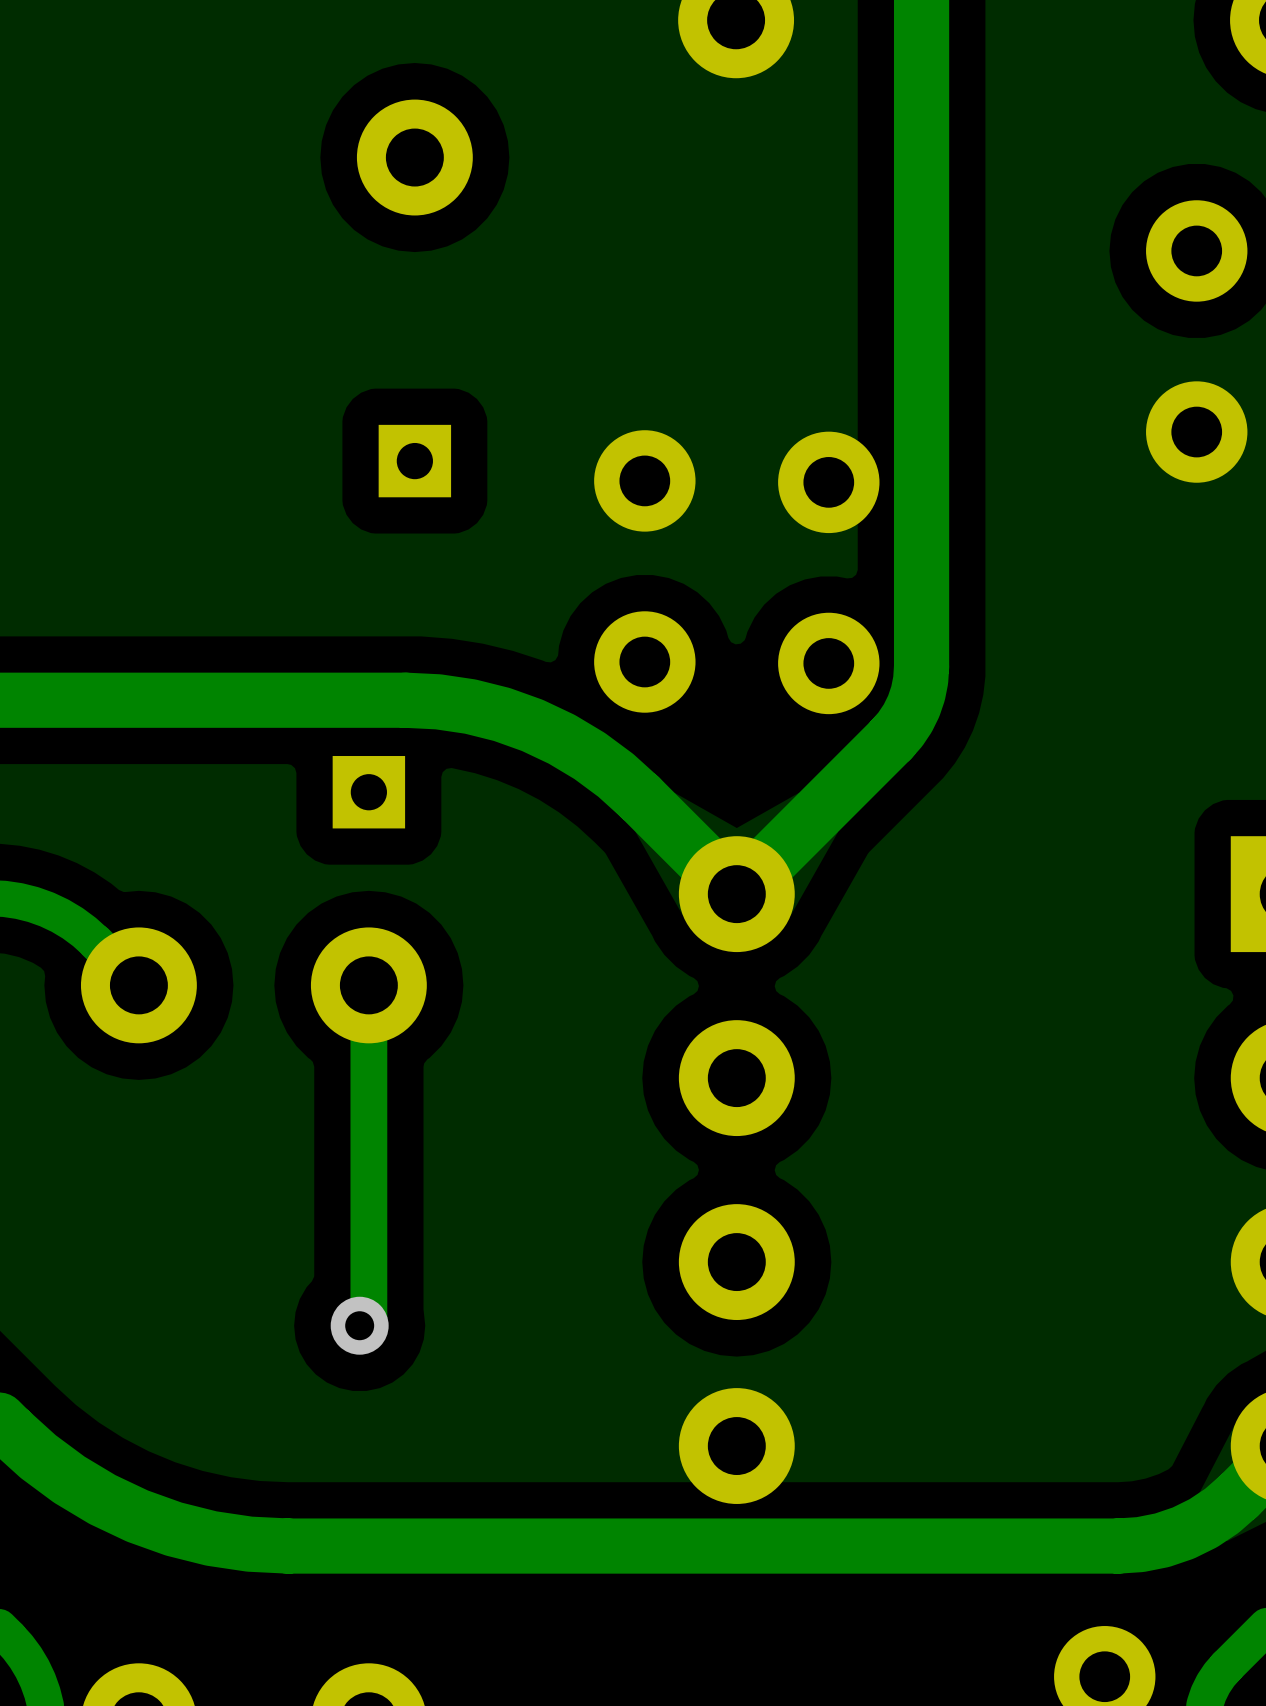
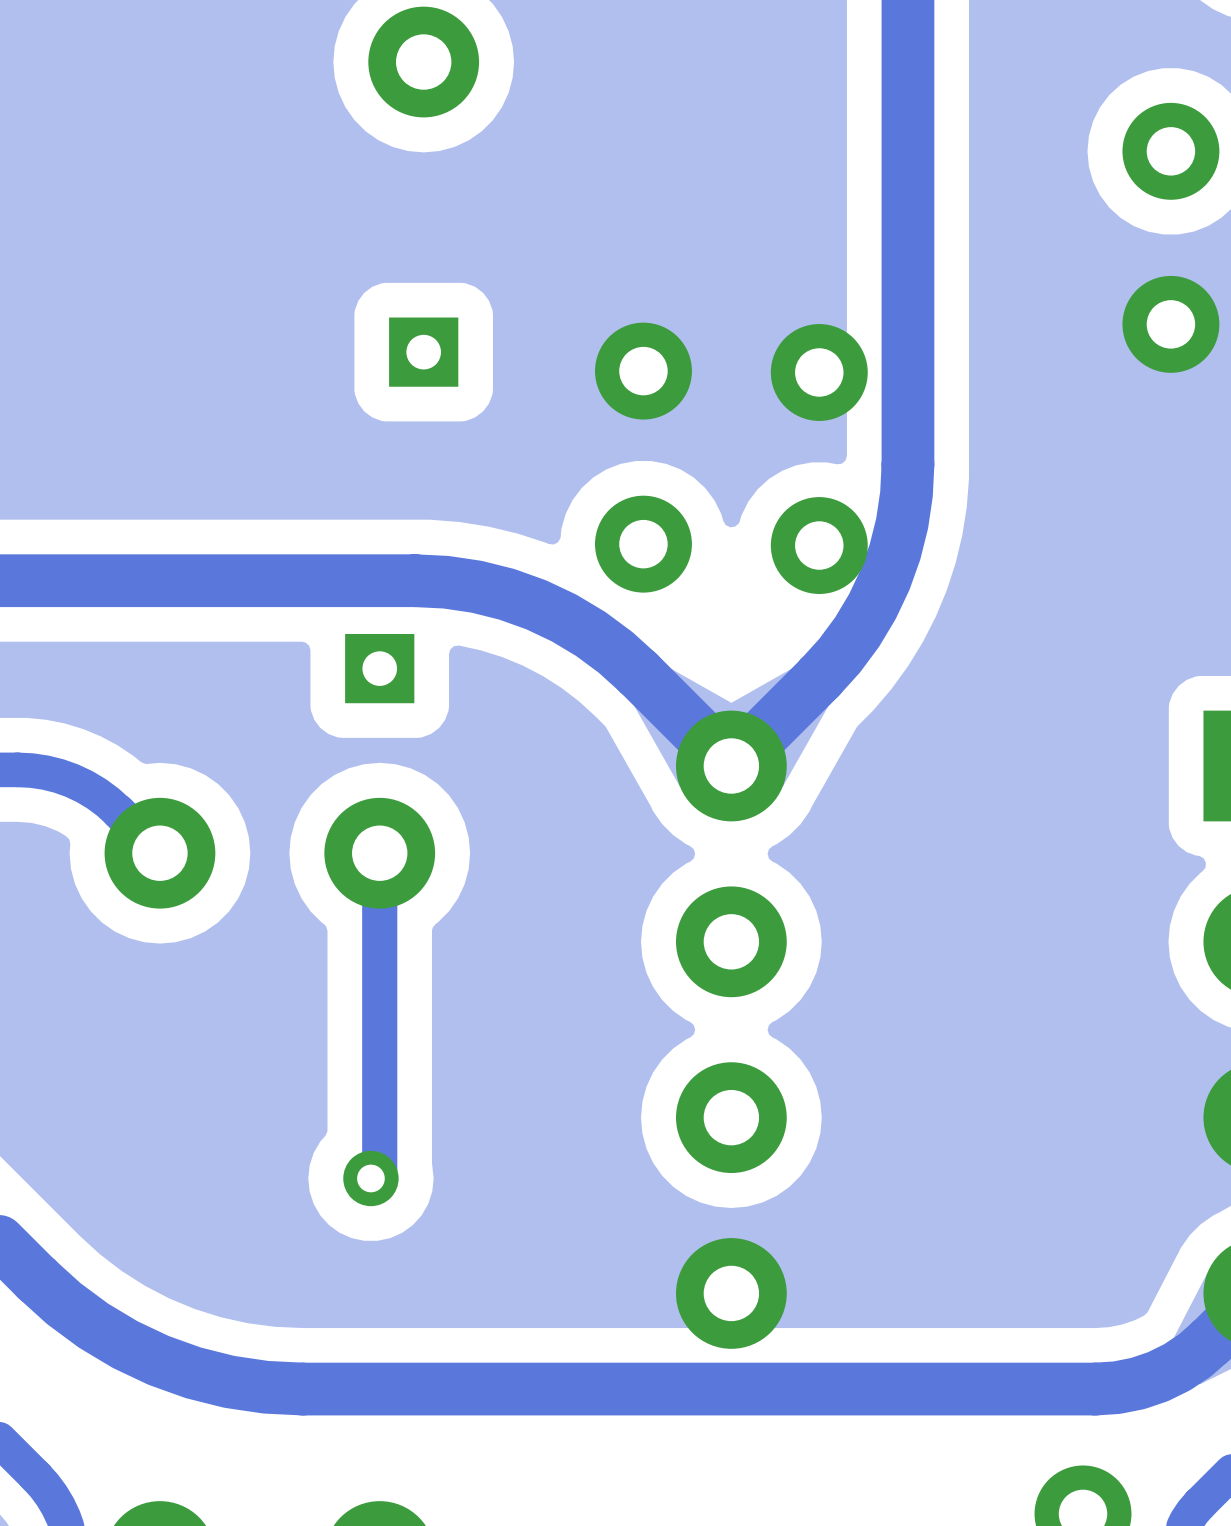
track: (921, 578) (921, 666) (920, 680) (913, 706) (900, 729) (891, 739) (829, 801) -> (907, 464) (902, 523) (885, 579) (857, 632) (819, 677)

